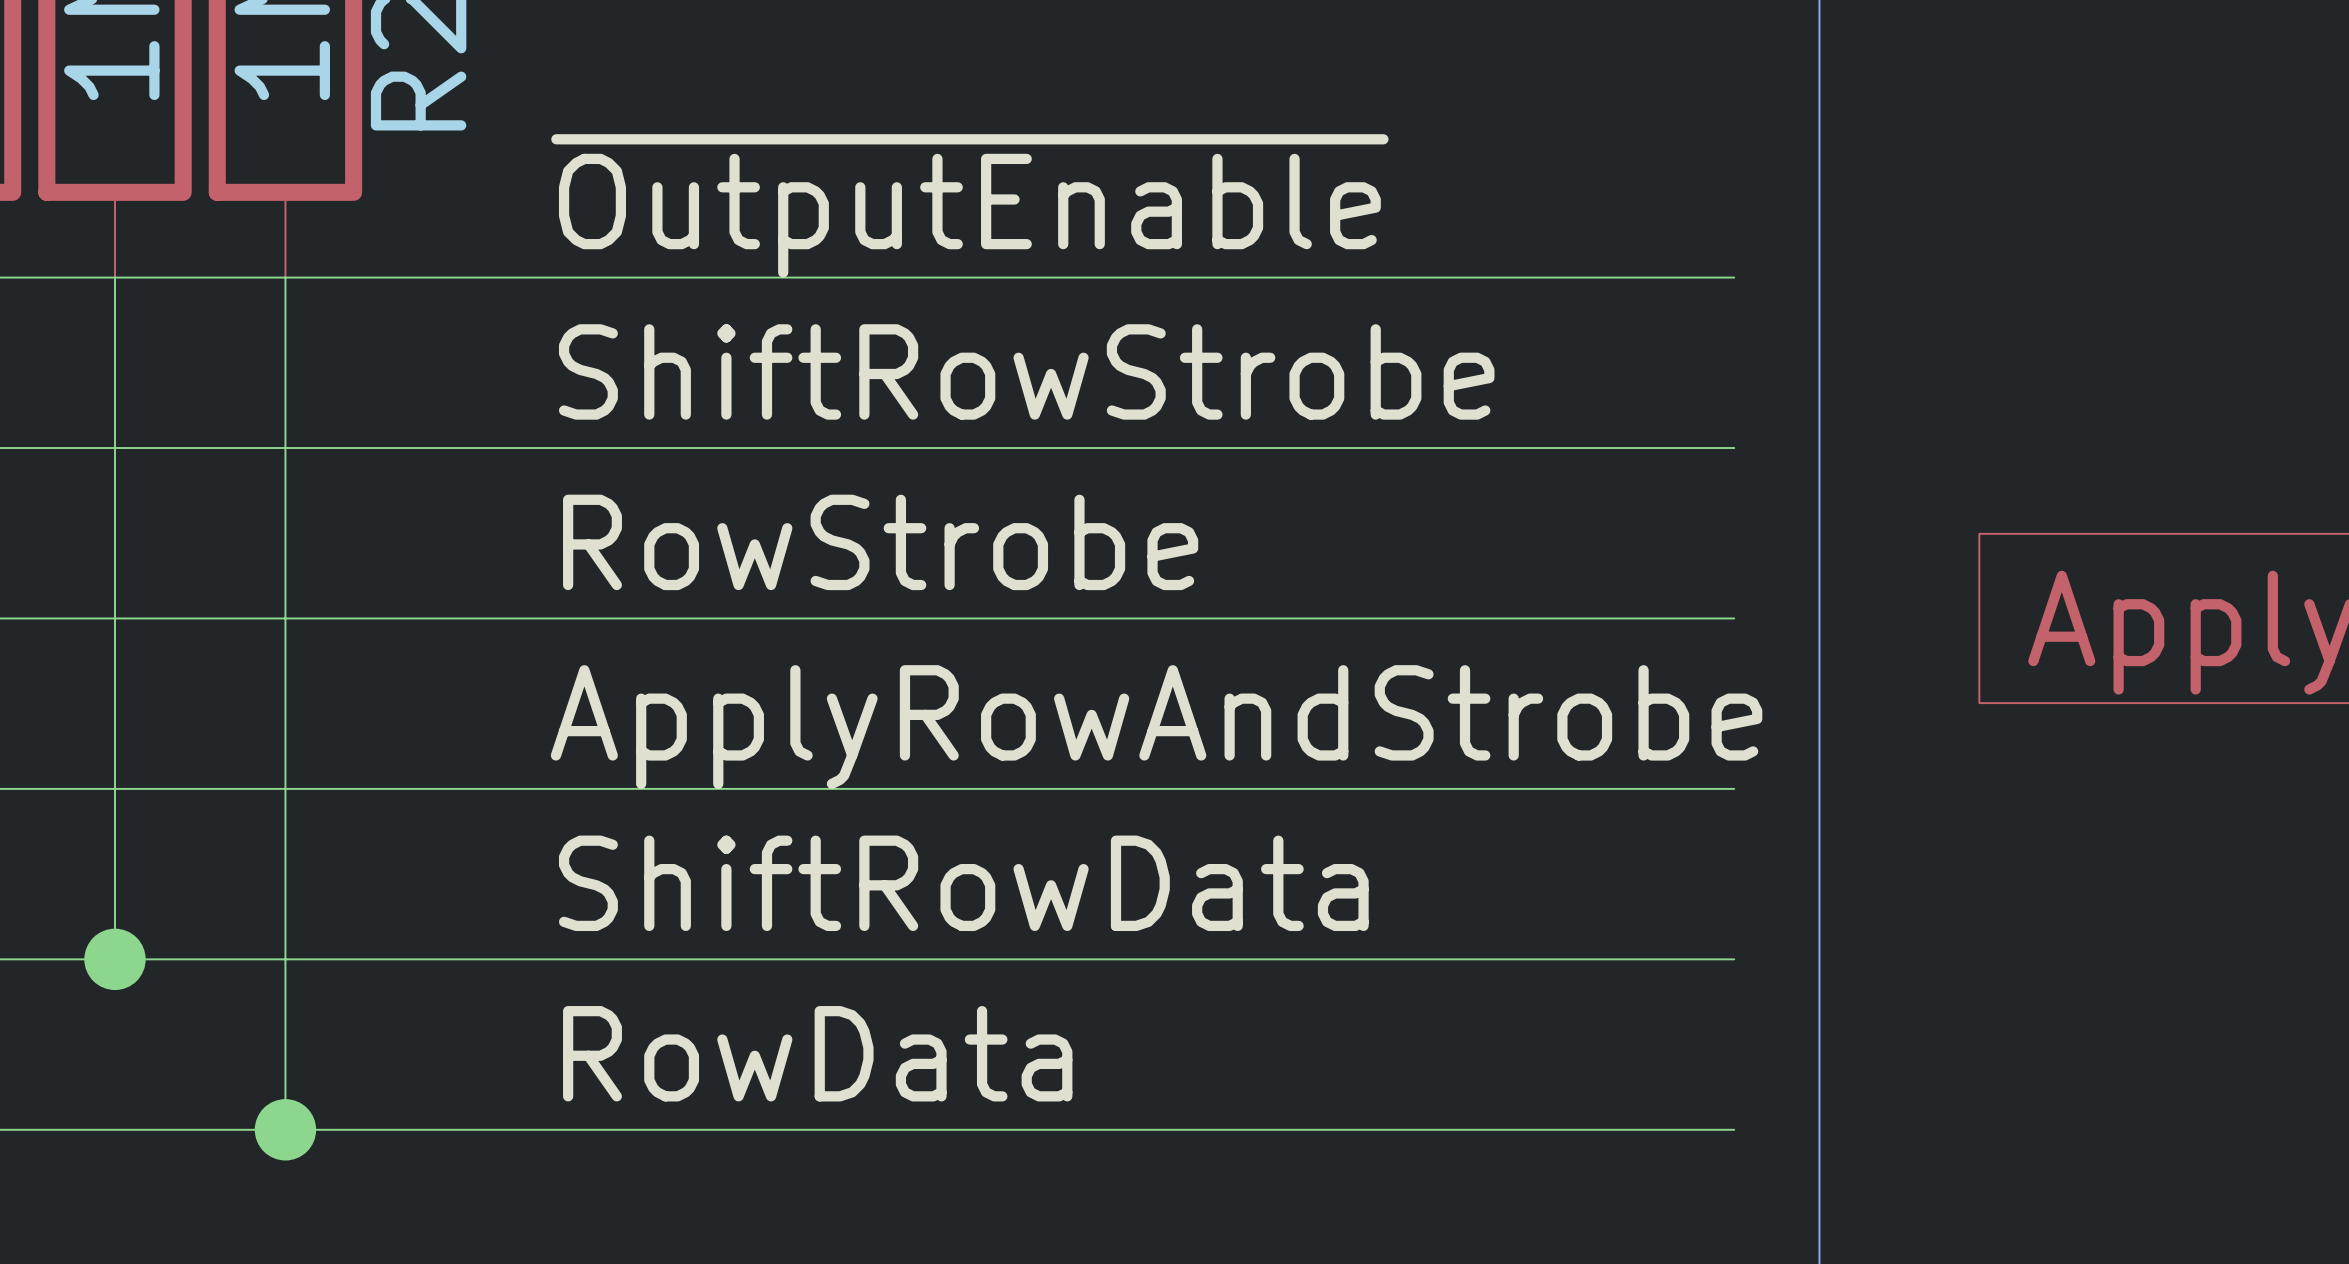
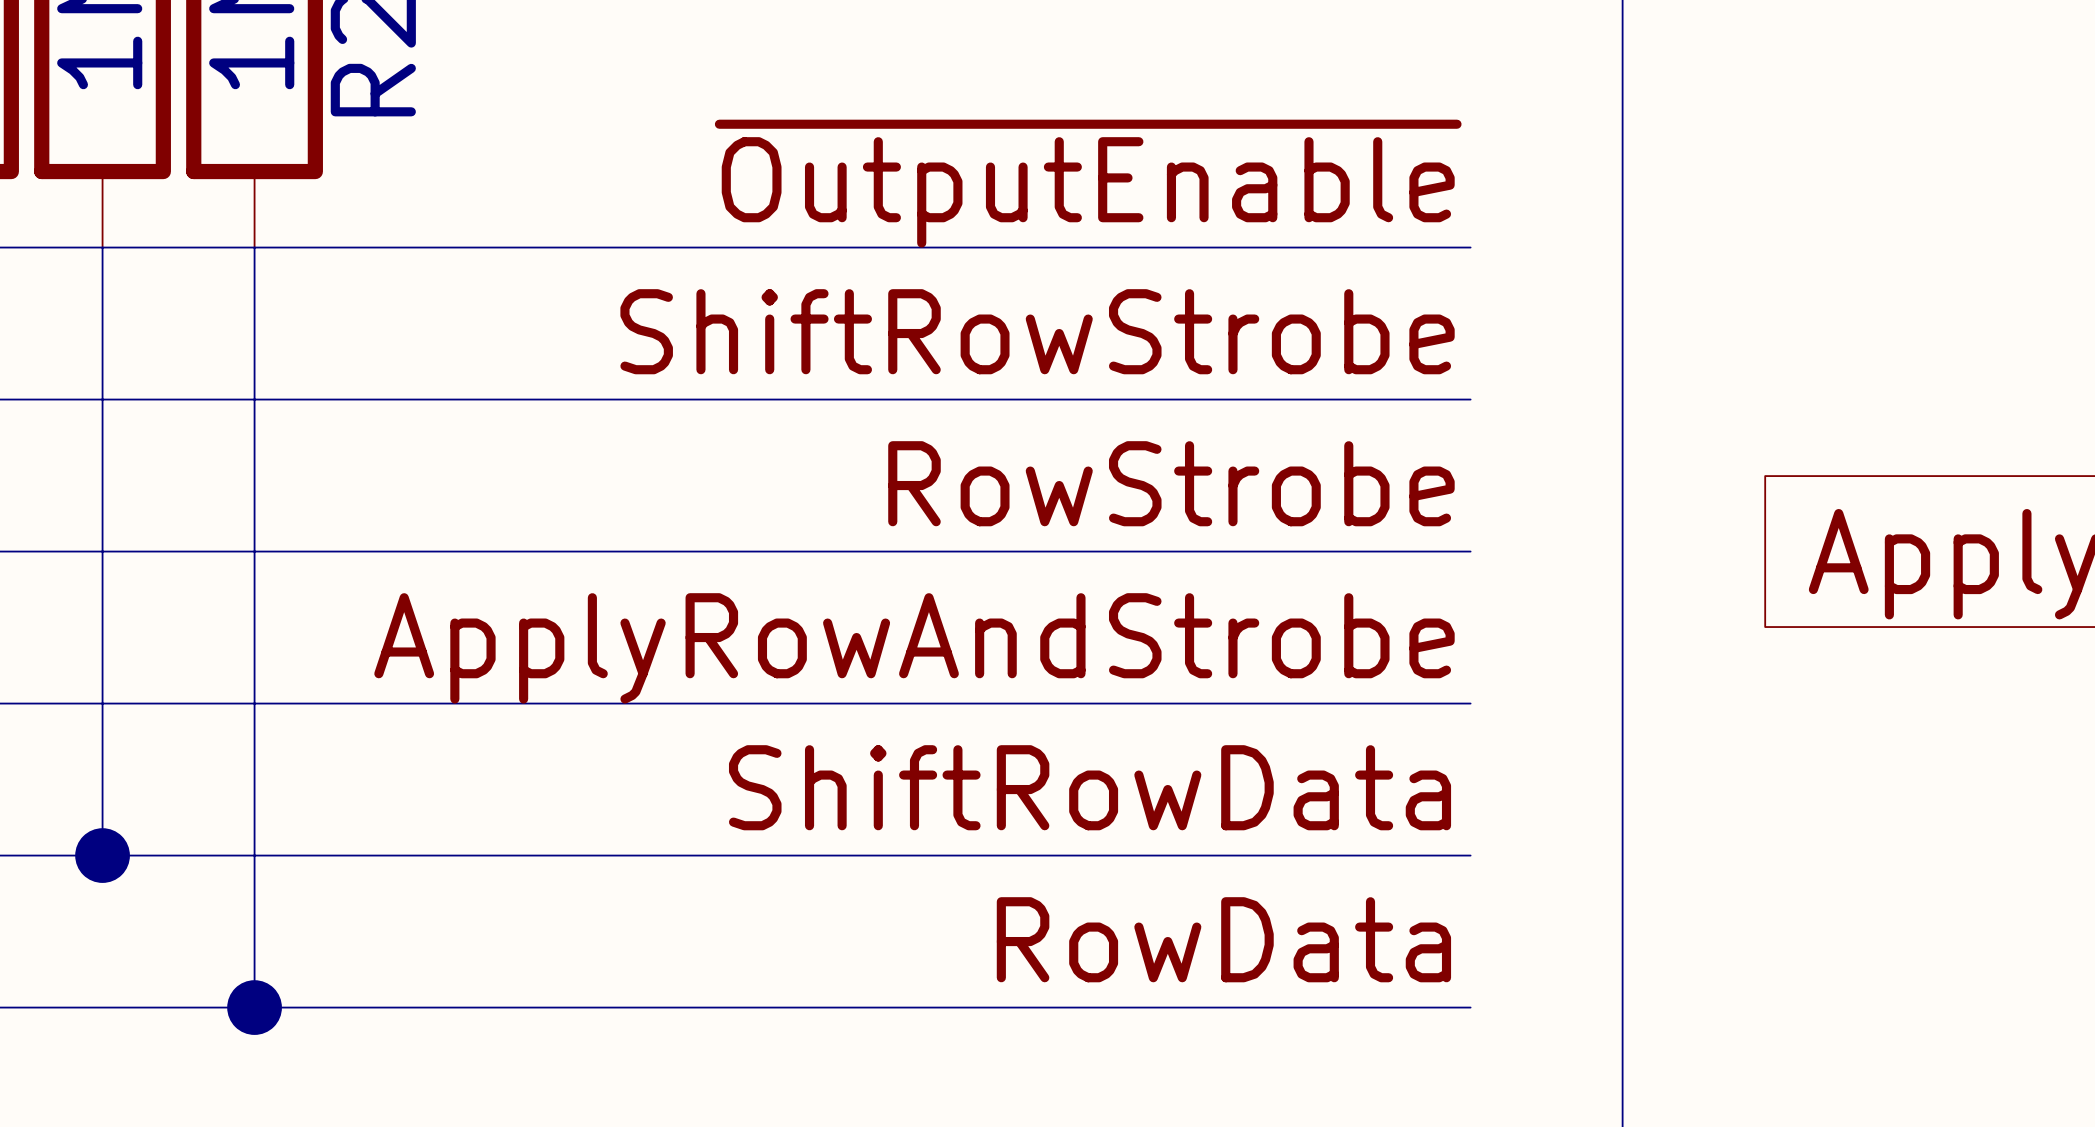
label position: ~{OutputEnable} (969, 205) -> ~{OutputEnable} (1088, 183)
wire: (1649, 277) (1734, 277) -> none
label position: ShiftRowStrobe (1026, 371) -> ShiftRowStrobe (1037, 331)
wire: (1649, 448) (1734, 448) -> none
label position: RowStrobe (880, 542) -> RowStrobe (1171, 483)
wire: (1649, 618) (1734, 618) -> none
label position: ApplyRowAndStrobe (1156, 727) -> ApplyRowAndStrobe (914, 648)
wire: (1649, 788) (1734, 788) -> none
label position: ShiftRowData (963, 883) -> ShiftRowData (1090, 787)
wire: (1649, 959) (1734, 959) -> none
label position: RowData (817, 1053) -> RowData (1223, 939)
wire: (1649, 1129) (1734, 1129) -> none

